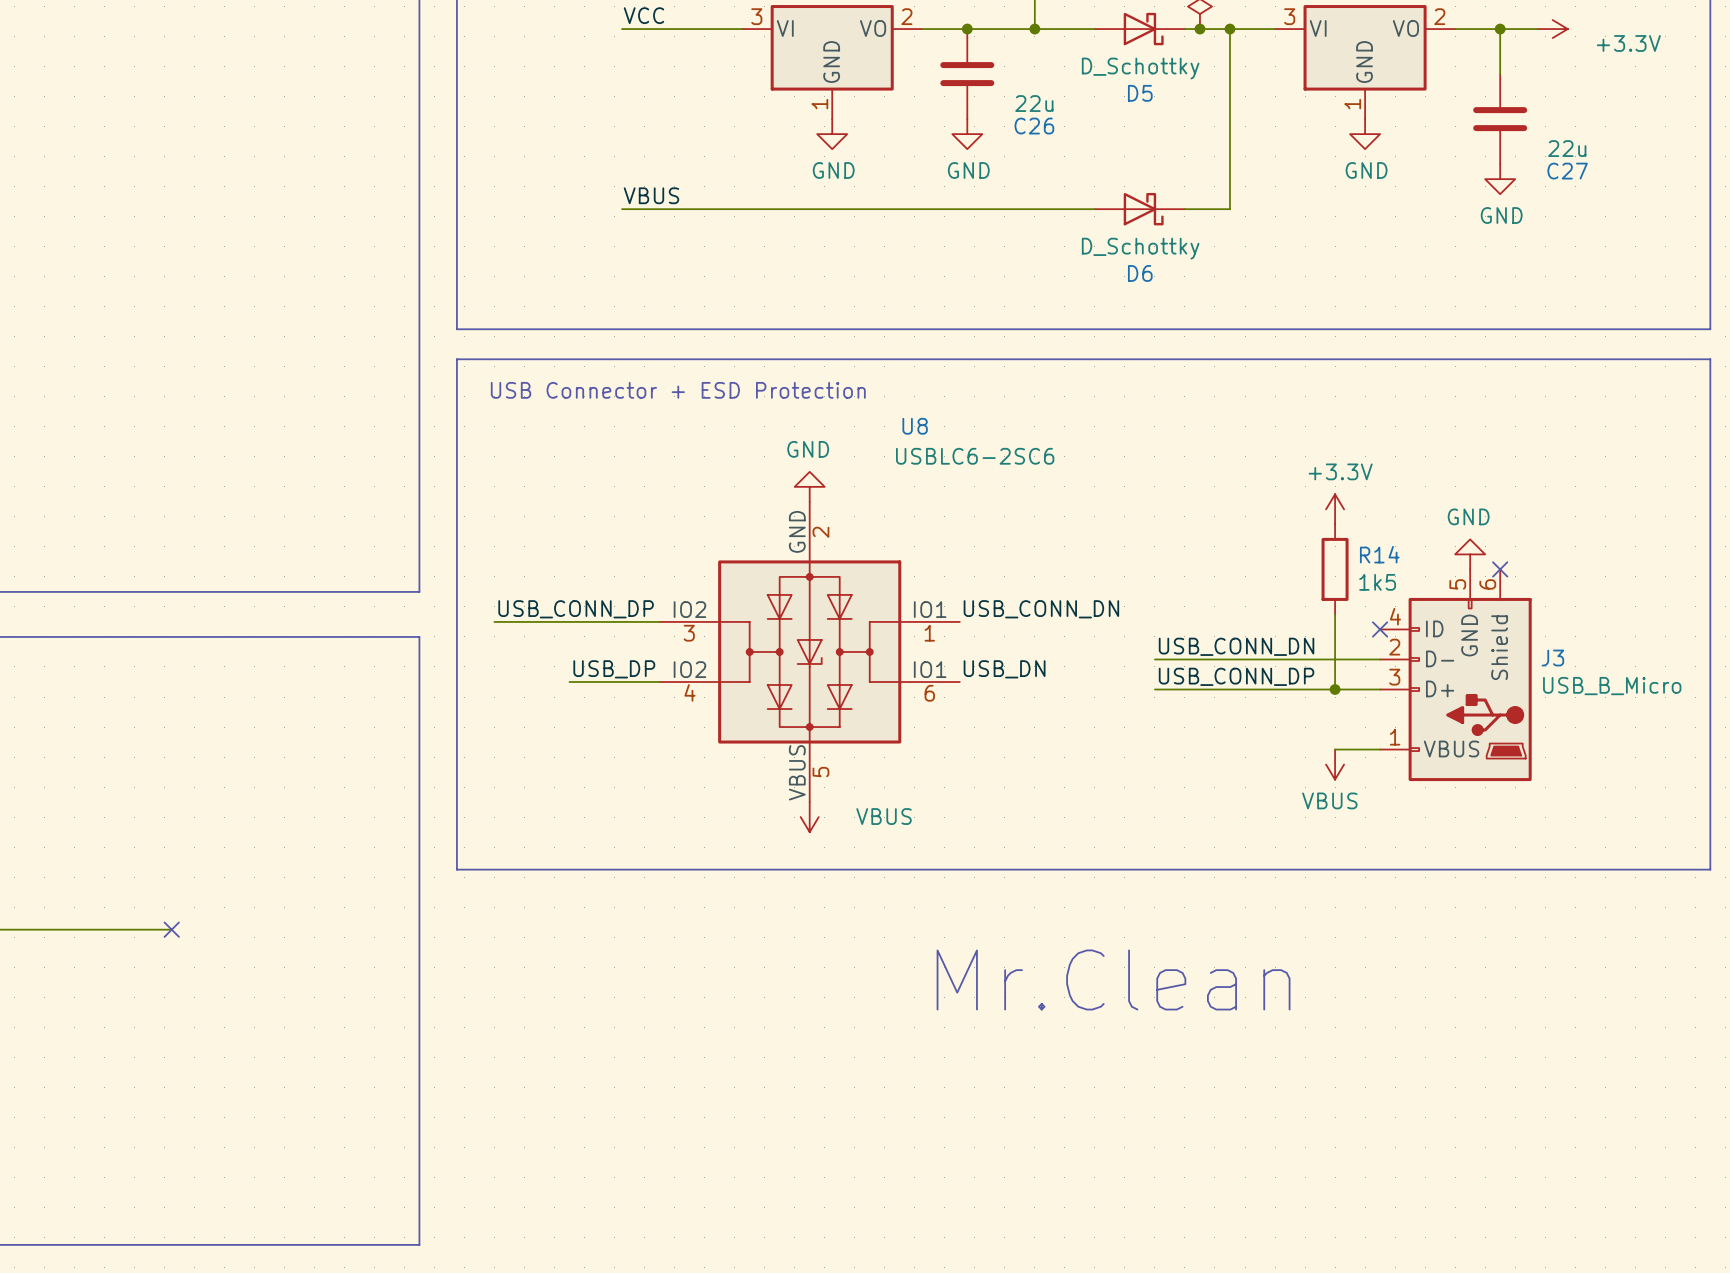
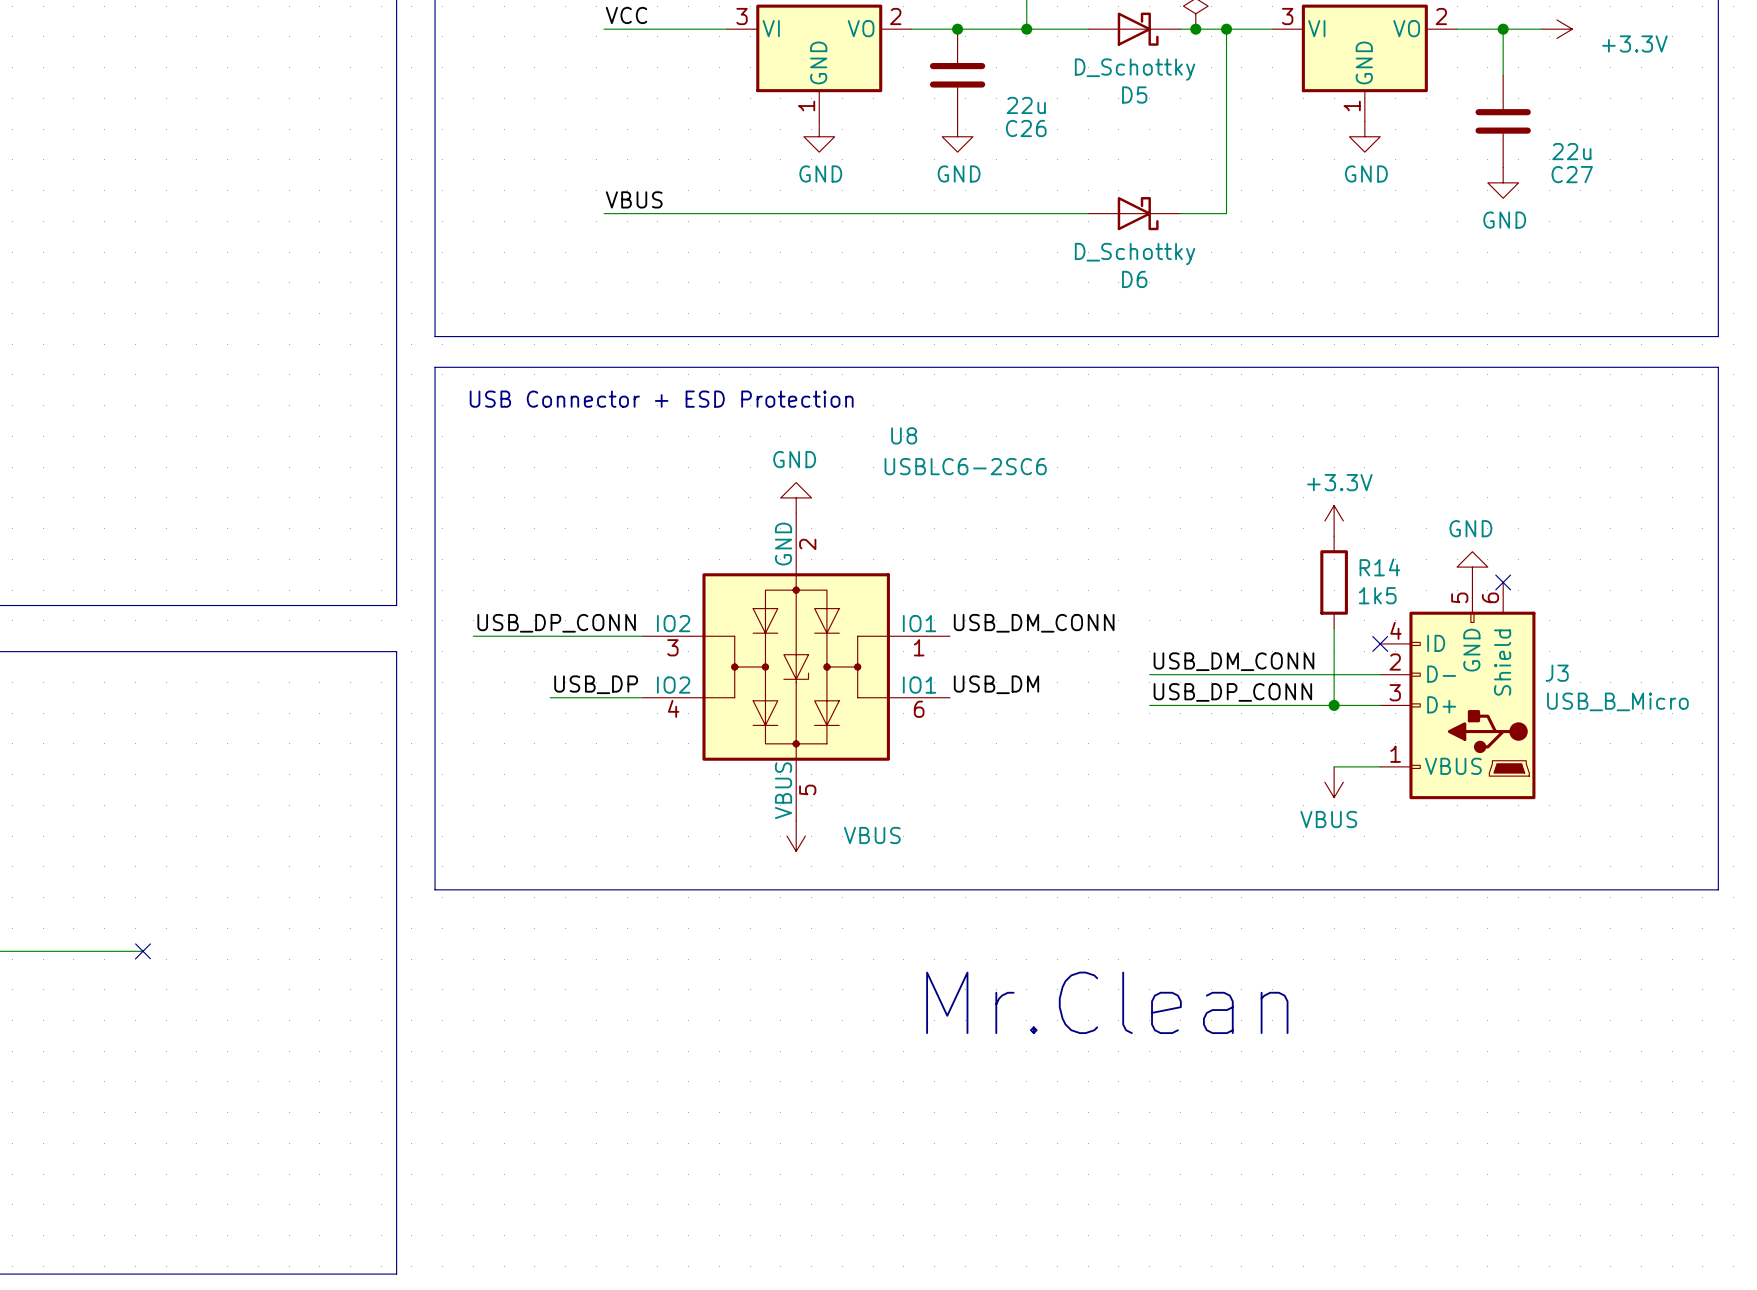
label: USB_CONN_DP (576, 609) -> USB_DP_CONN (556, 623)
label: USB_CONN_DN (1041, 609) -> USB_DM_CONN (1034, 623)
label: USB_CONN_DN (1236, 646) -> USB_DM_CONN (1233, 661)
label: USB_DN (1004, 669) -> USB_DM (996, 684)
label: USB_CONN_DP (1236, 676) -> USB_DP_CONN (1232, 692)

